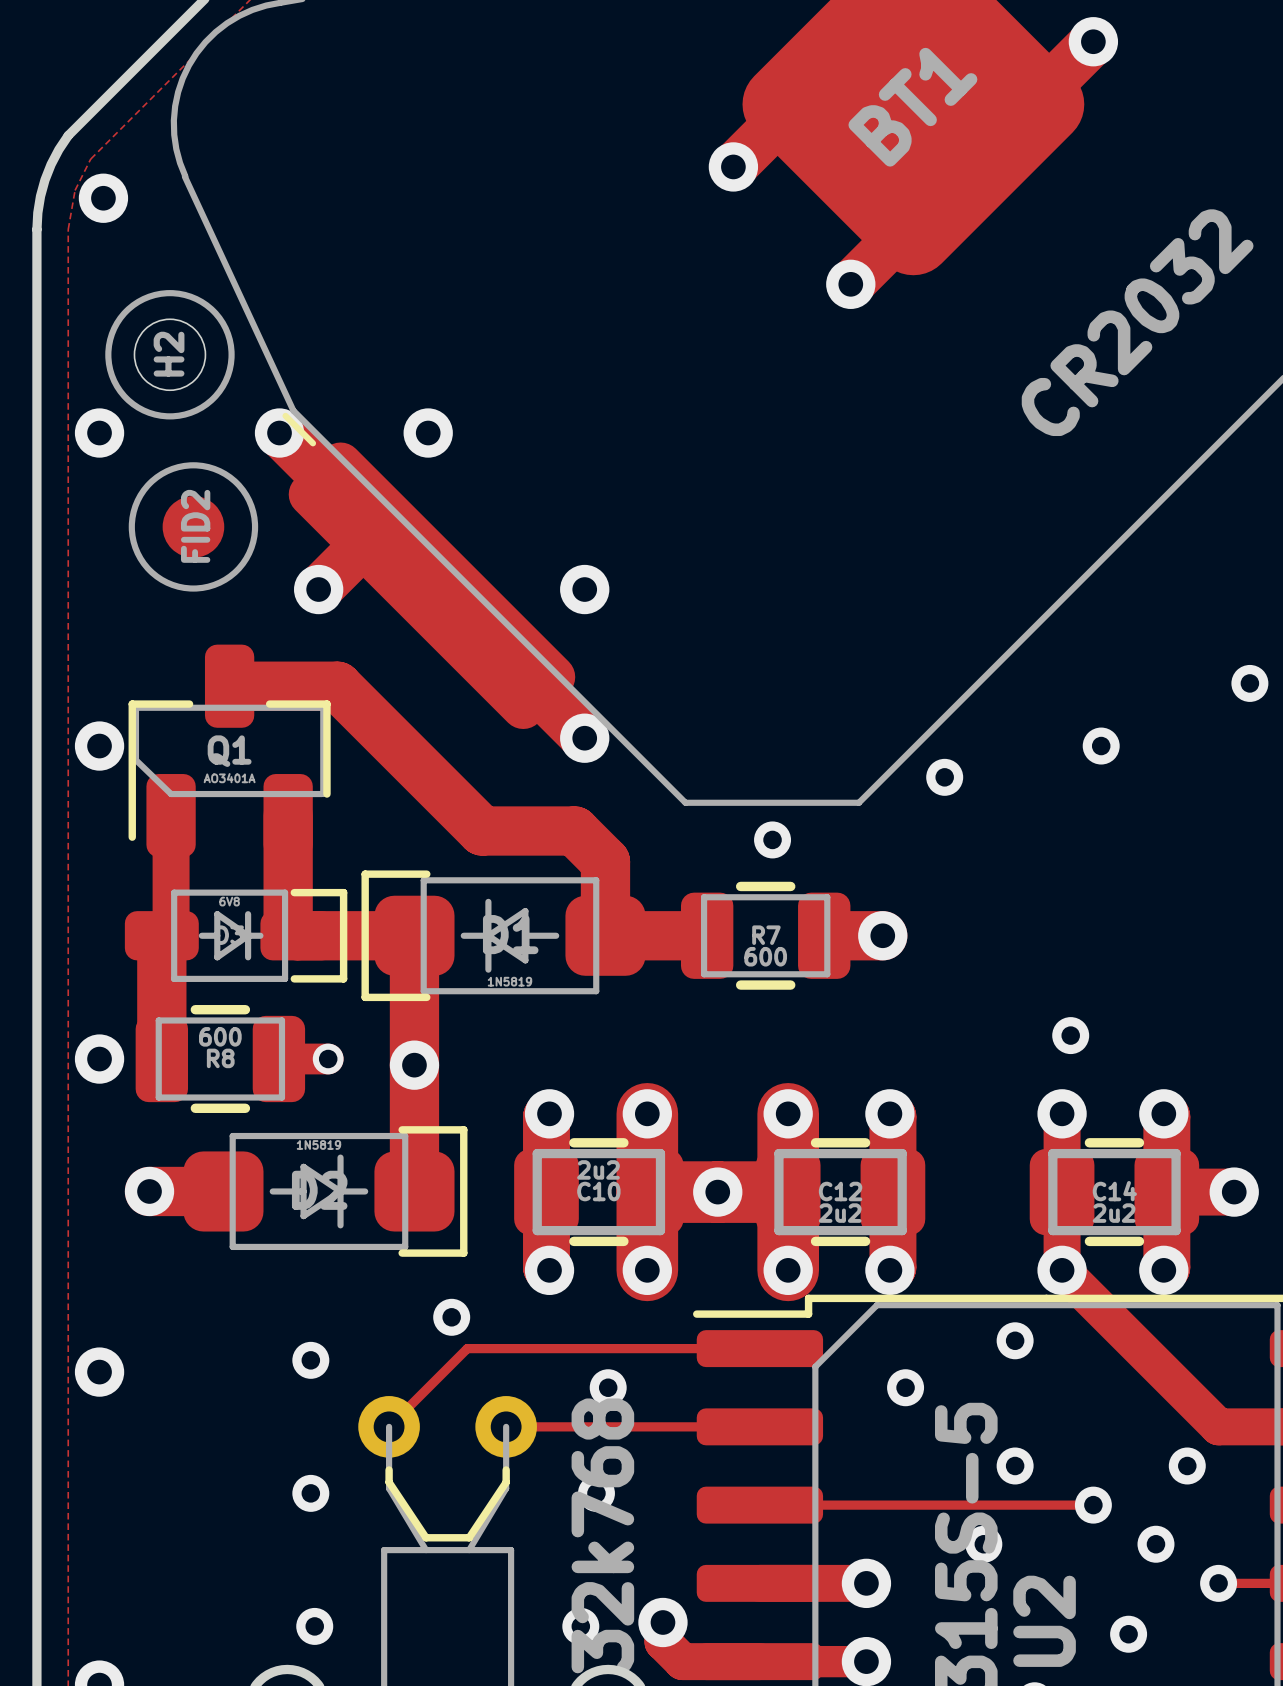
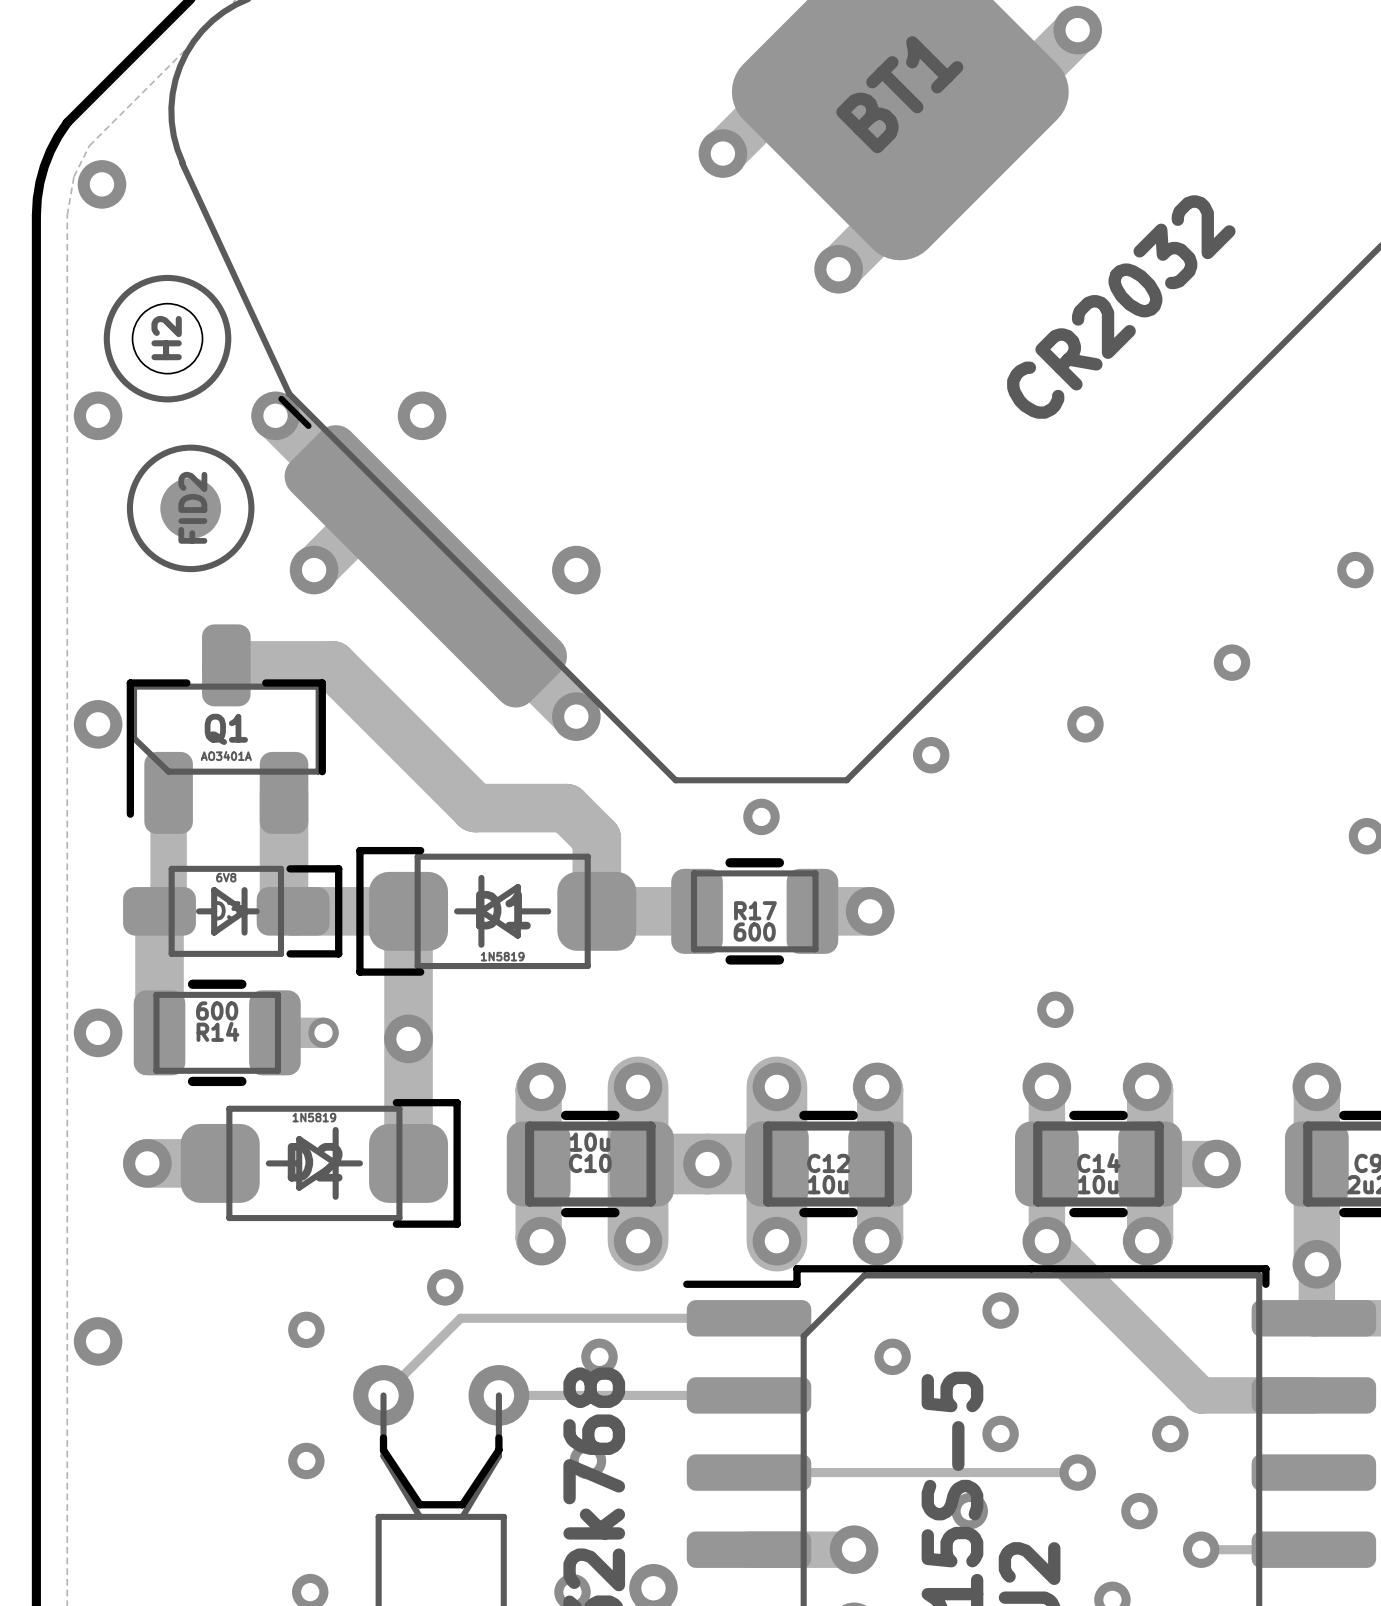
R7 name: R7 (766, 935) -> R17 (755, 910)
R8 name: R8 (220, 1058) -> R14 (217, 1031)
C10 value: 2u2 (598, 1169) -> 10u (589, 1142)
C12 value: 2u2 (840, 1213) -> 10u (828, 1184)
C14 value: 2u2 (1114, 1213) -> 10u (1098, 1184)

